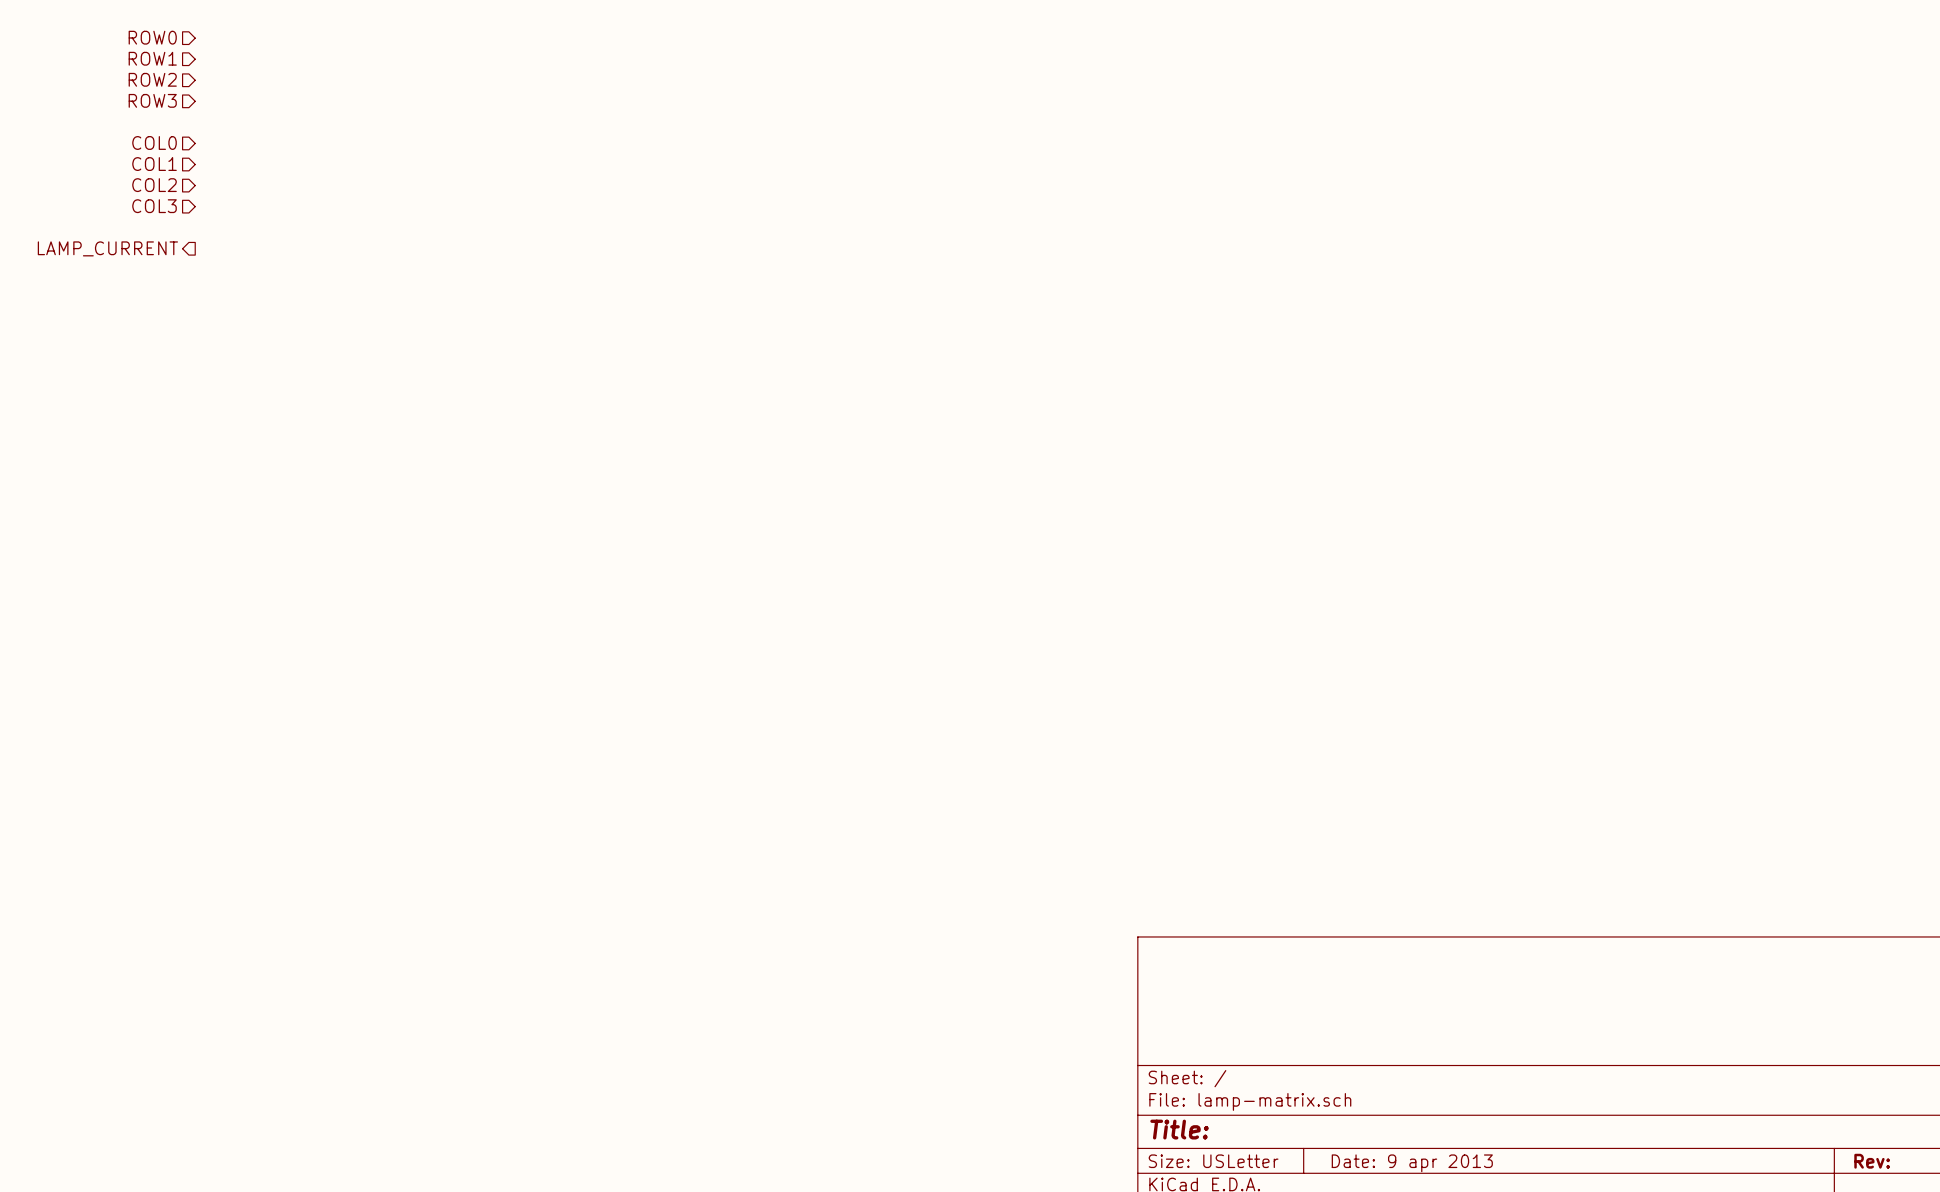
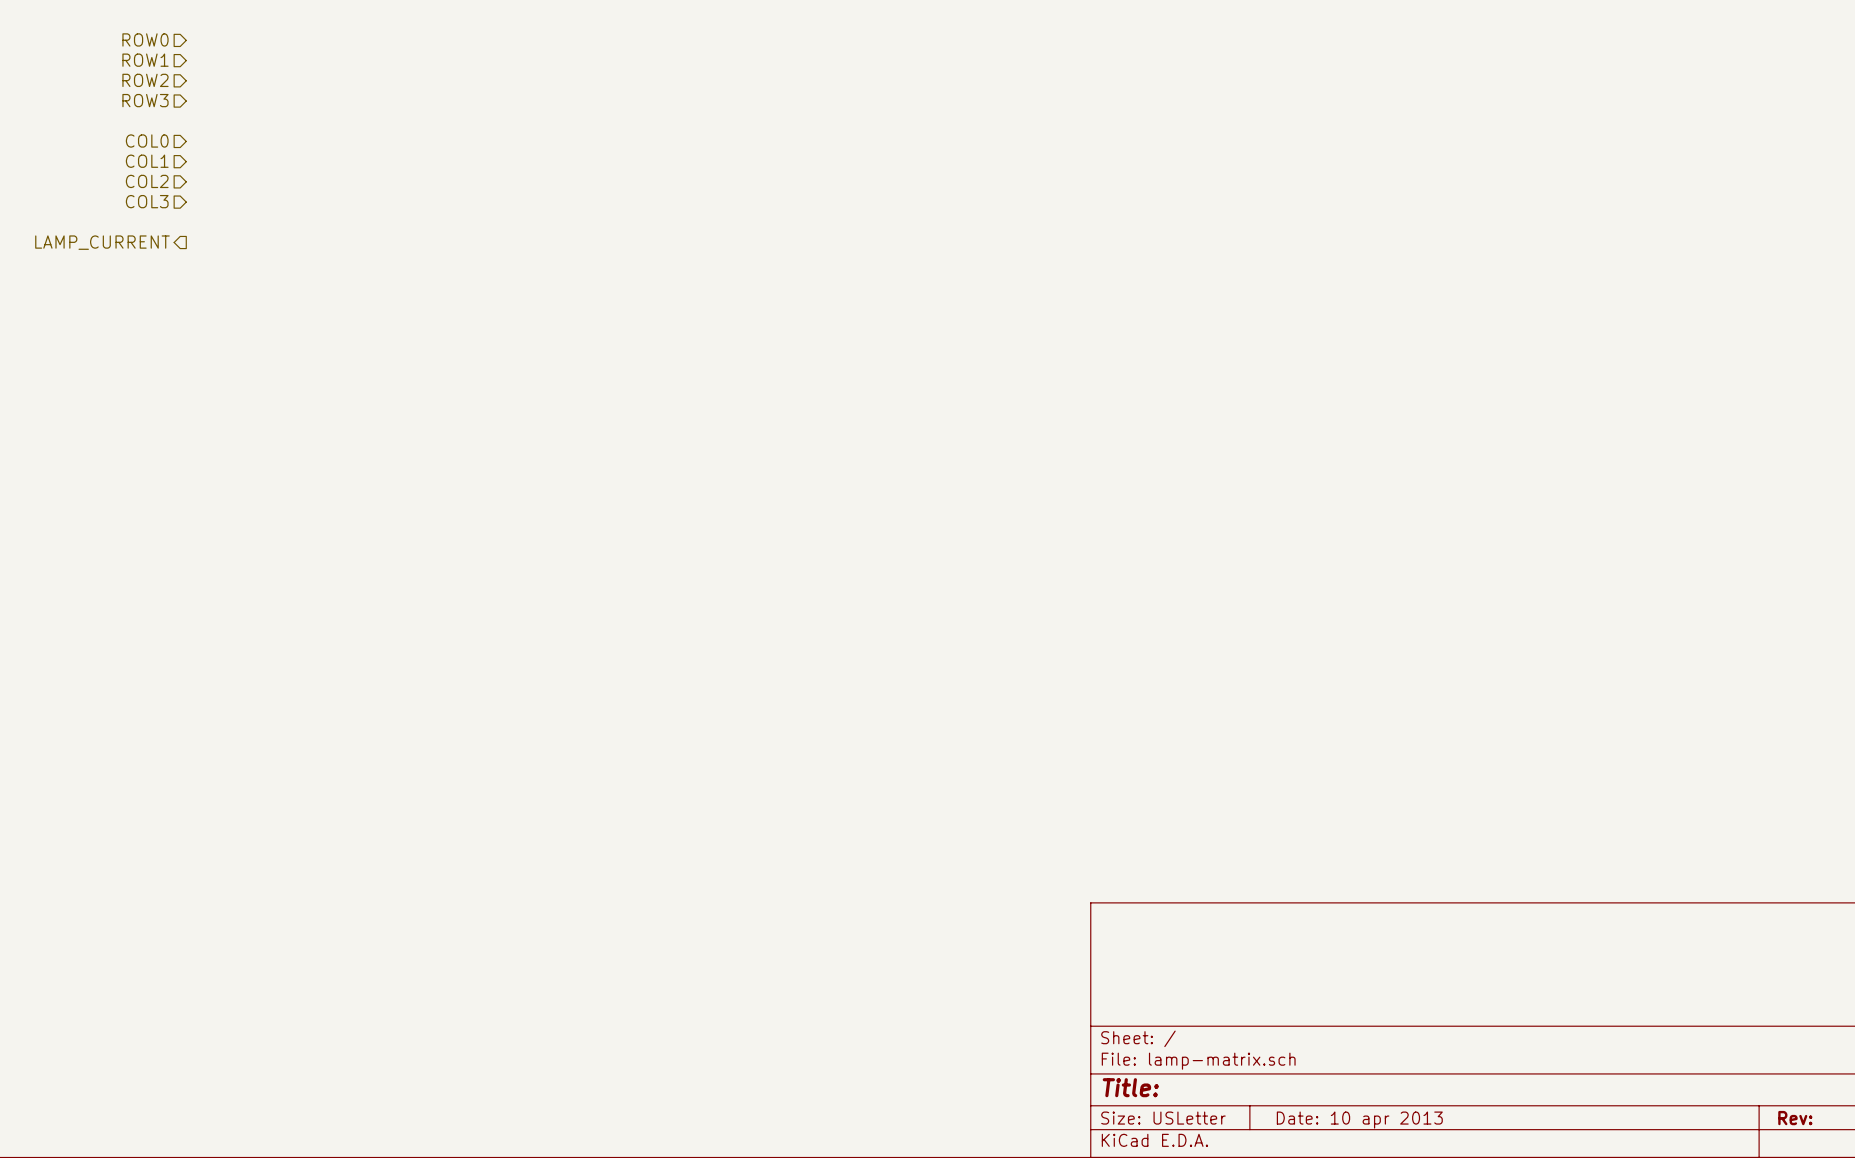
title block: Date: 9 apr 2013 (1412, 1163) -> Date: 10 apr 2013 (1359, 1120)

